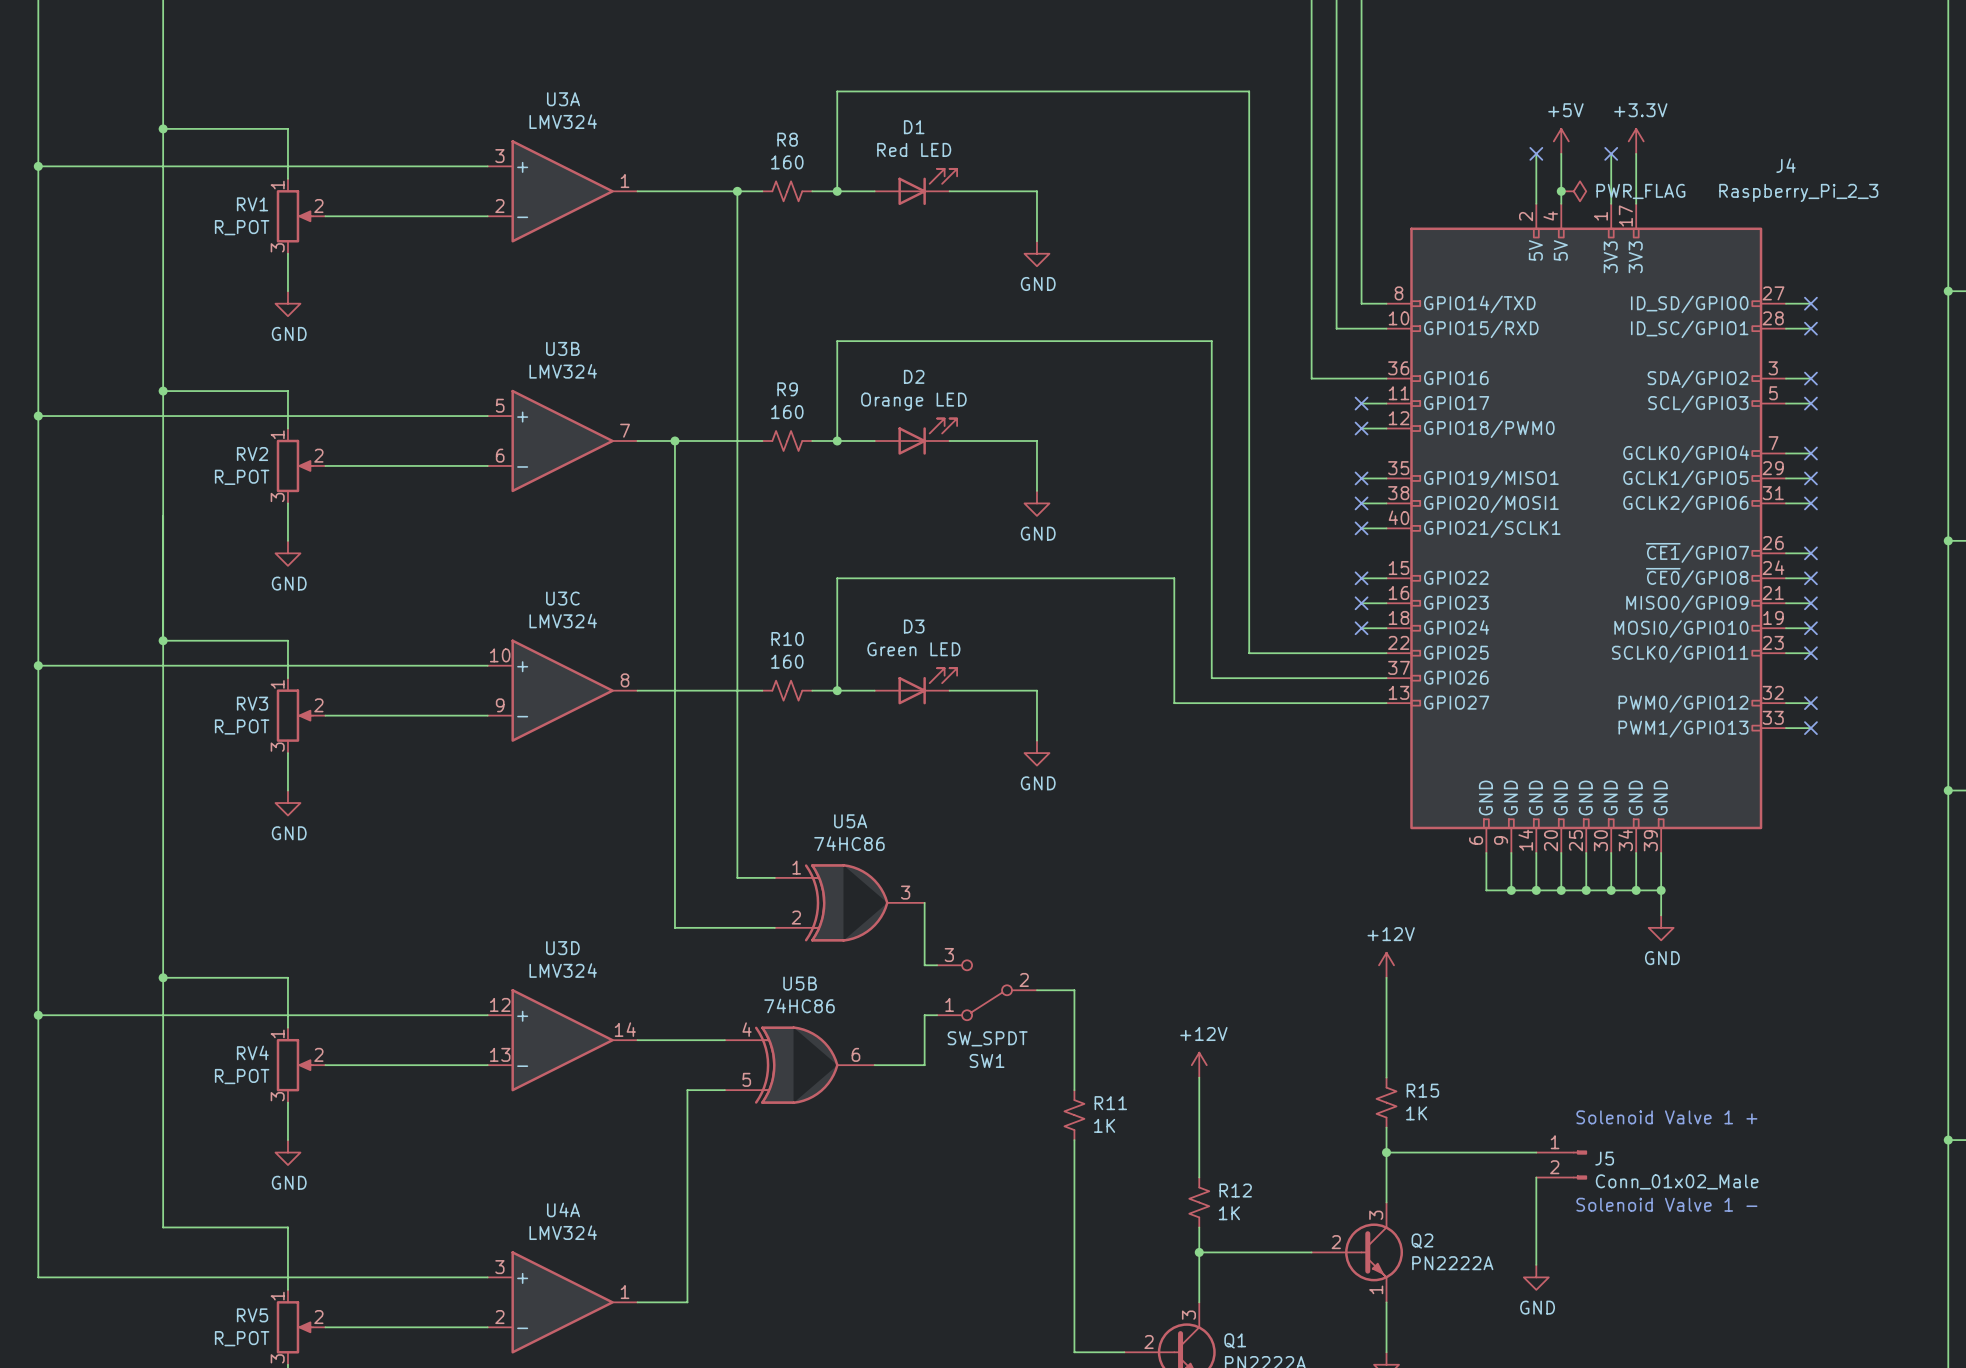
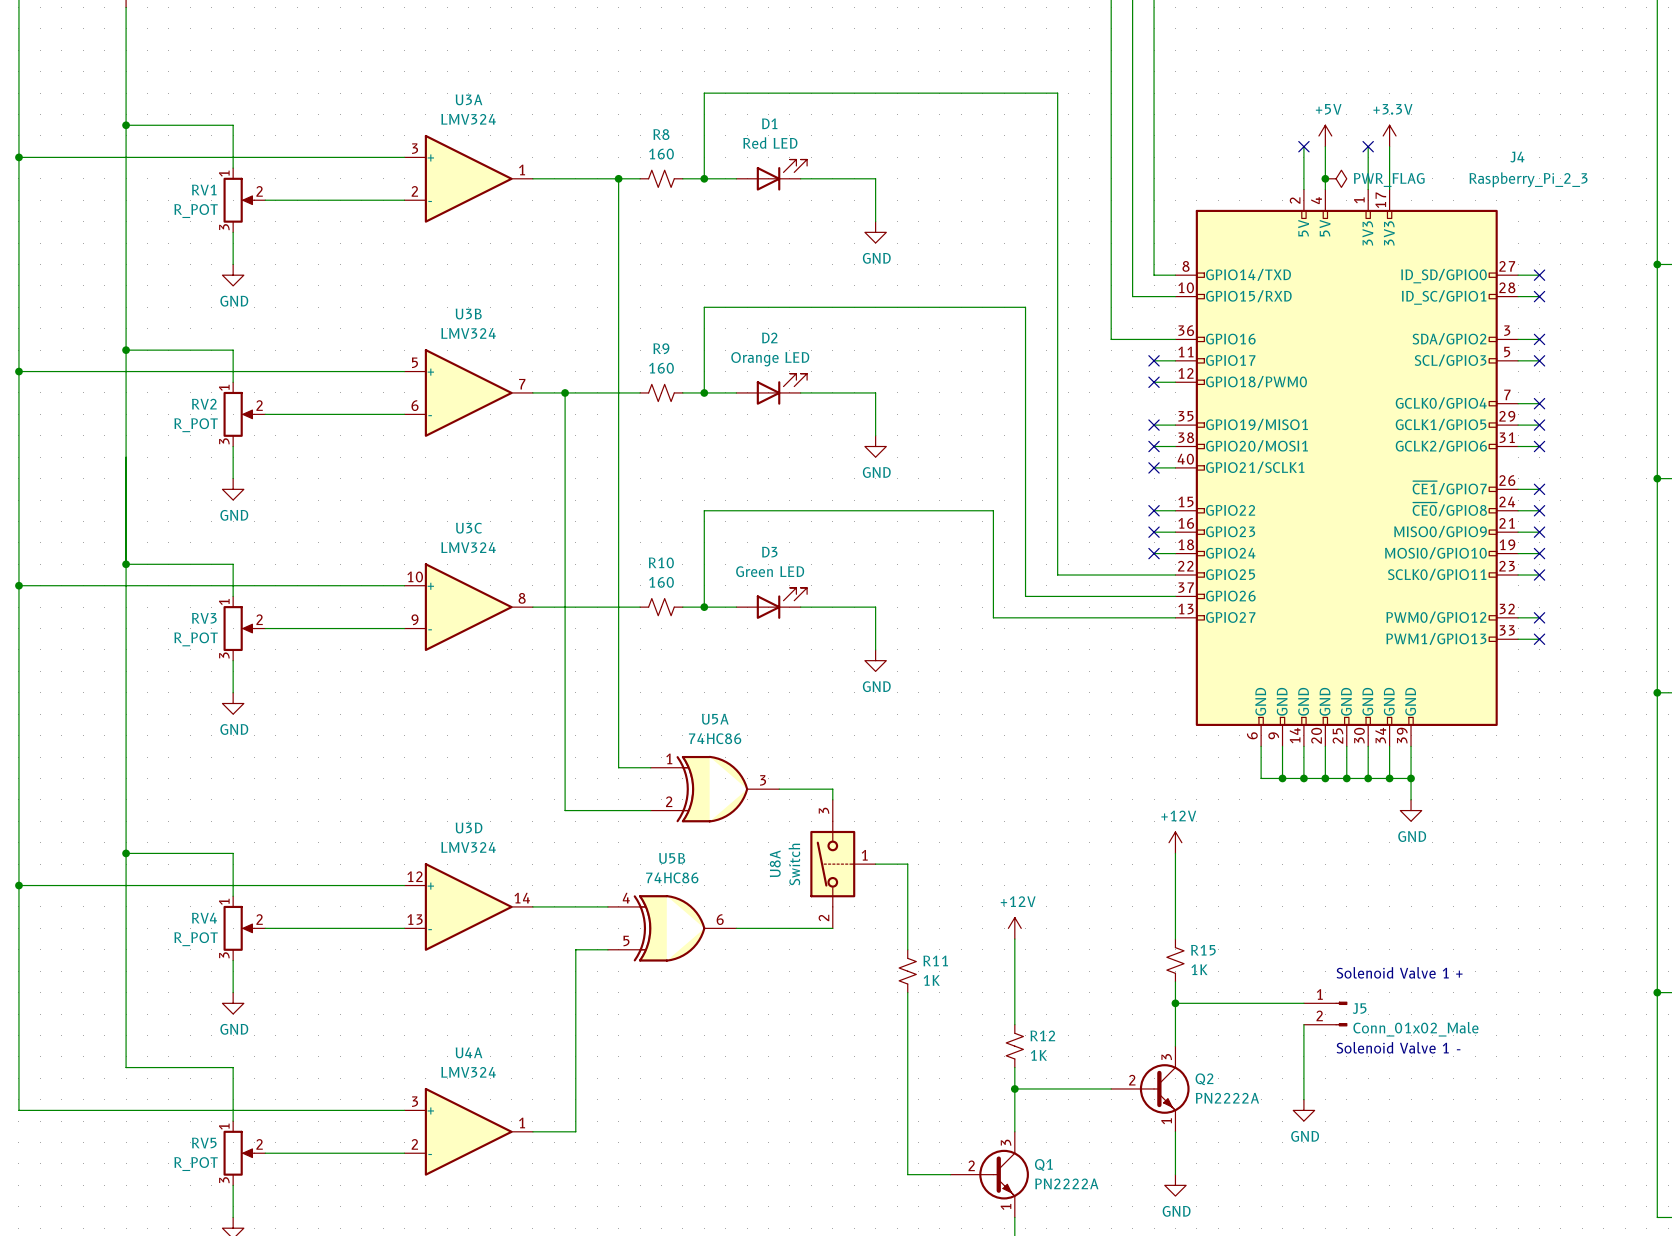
wire: (924, 902) (924, 965) (937, 965) -> (779, 789) (832, 789) (832, 799)
SW1: SW_SPDT (987, 990) -> none
U8A: none -> Switch (842, 864)
wire: (937, 1015) (924, 1015) (924, 1065) -> (832, 928) (779, 928)

